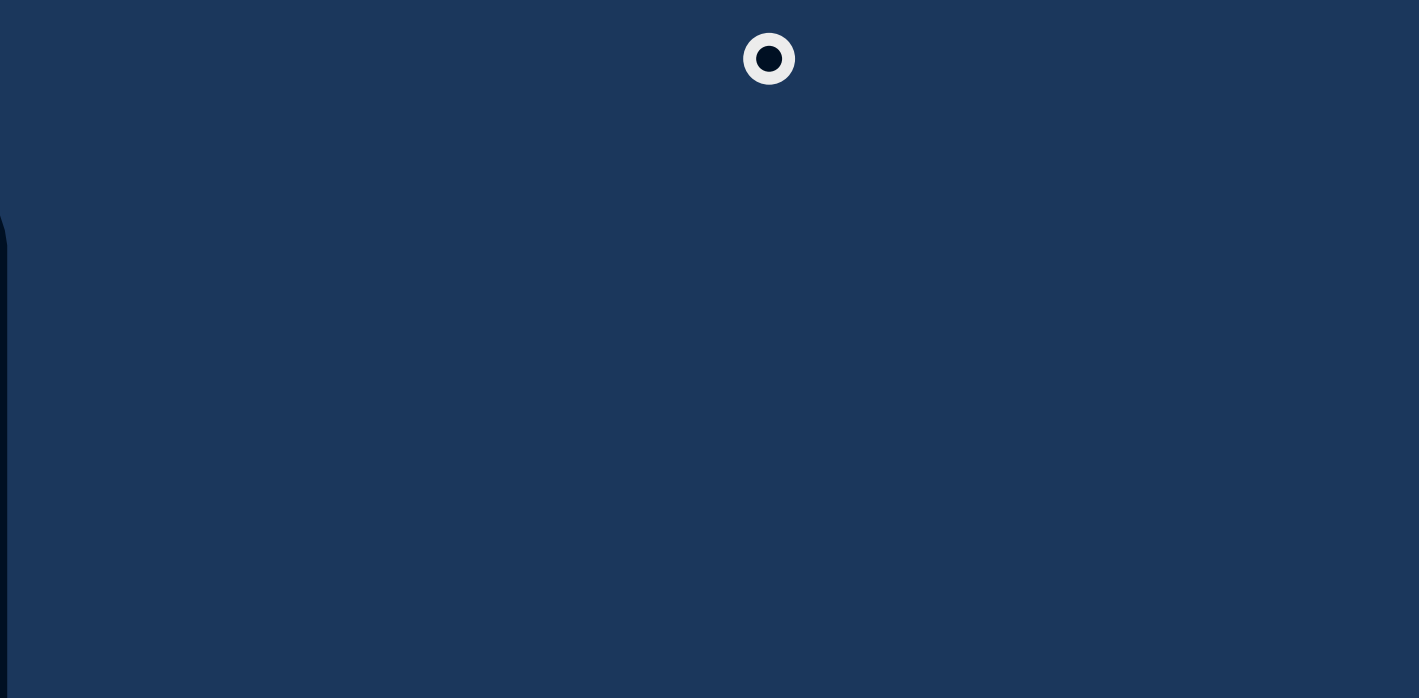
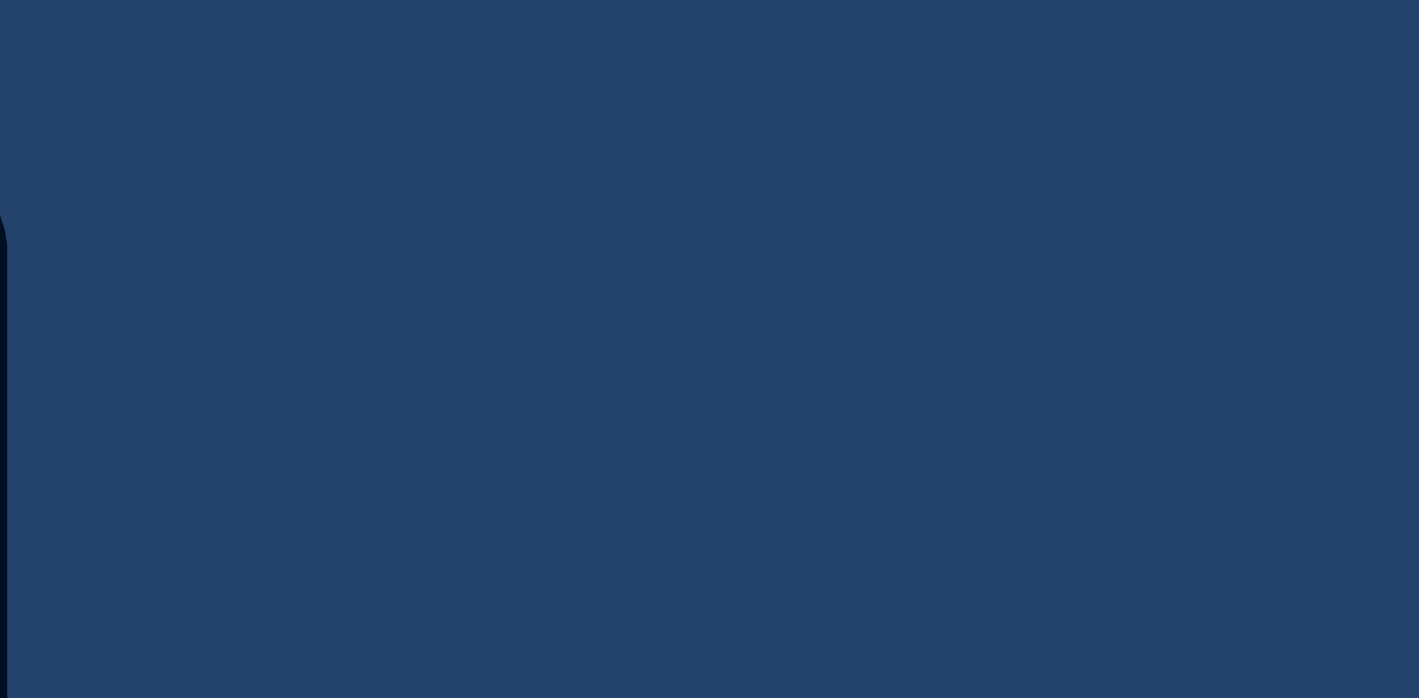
via: (769, 58) -> none

